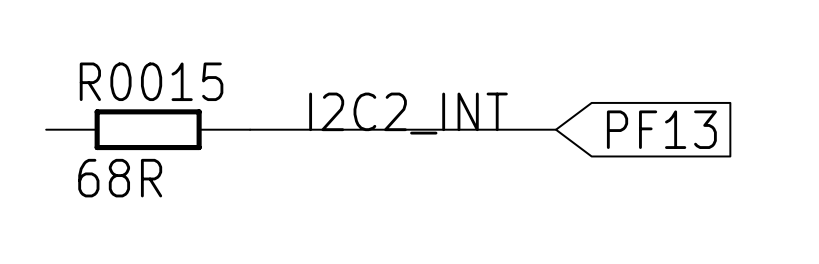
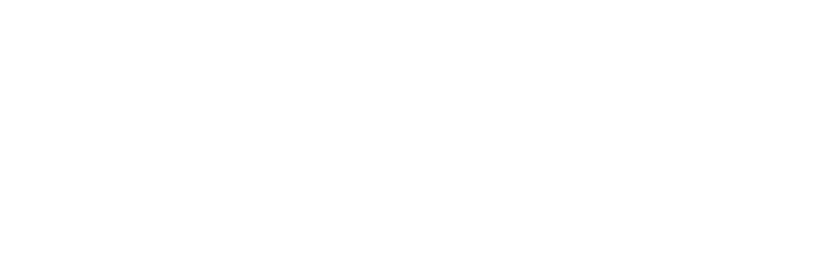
text: I2C2_INT (408, 113) -> none
R0015: 68R (148, 129) -> none
wire: (250, 129) (555, 129) -> none
global label: PF13 (661, 129) -> none

